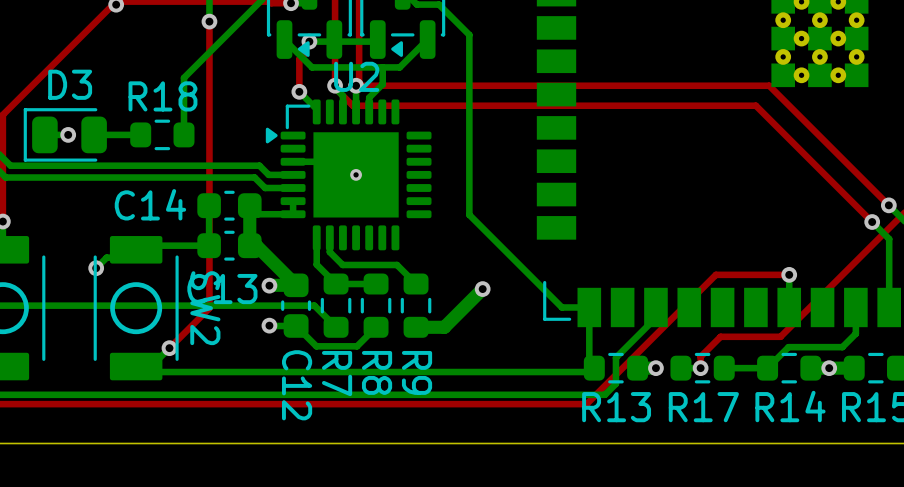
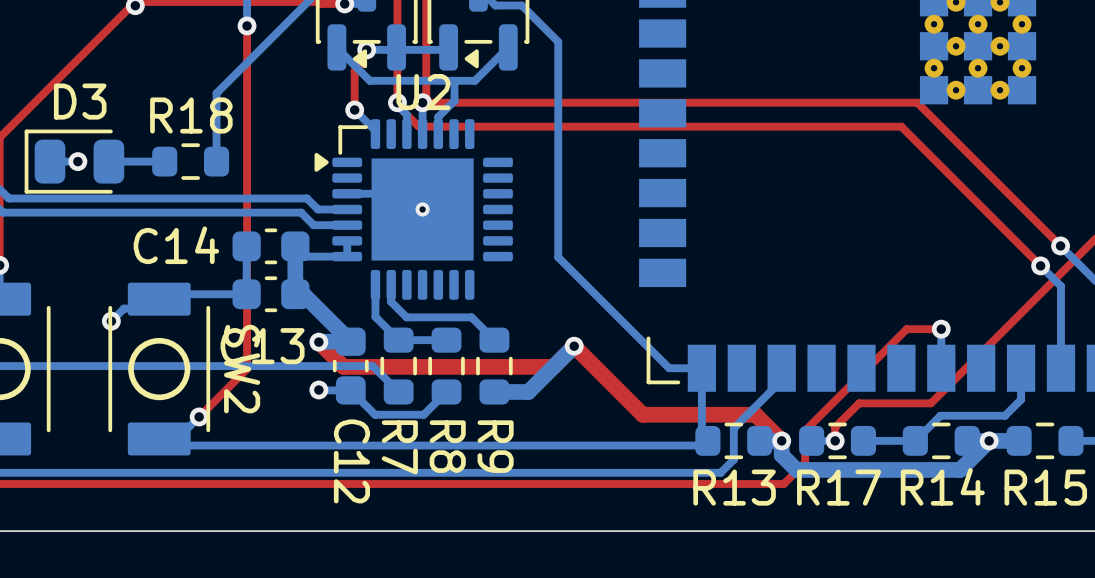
top track: (760, 274) (715, 274) (586, 404) -> (906, 329) (805, 430) (805, 462) (783, 483) (698, 483)
top track: none -> (318, 342) (343, 366) (553, 366) (574, 346) (642, 414) (755, 414) (781, 440)
bottom track: none -> (989, 440) (960, 469) (796, 469) (781, 455) (781, 440)

